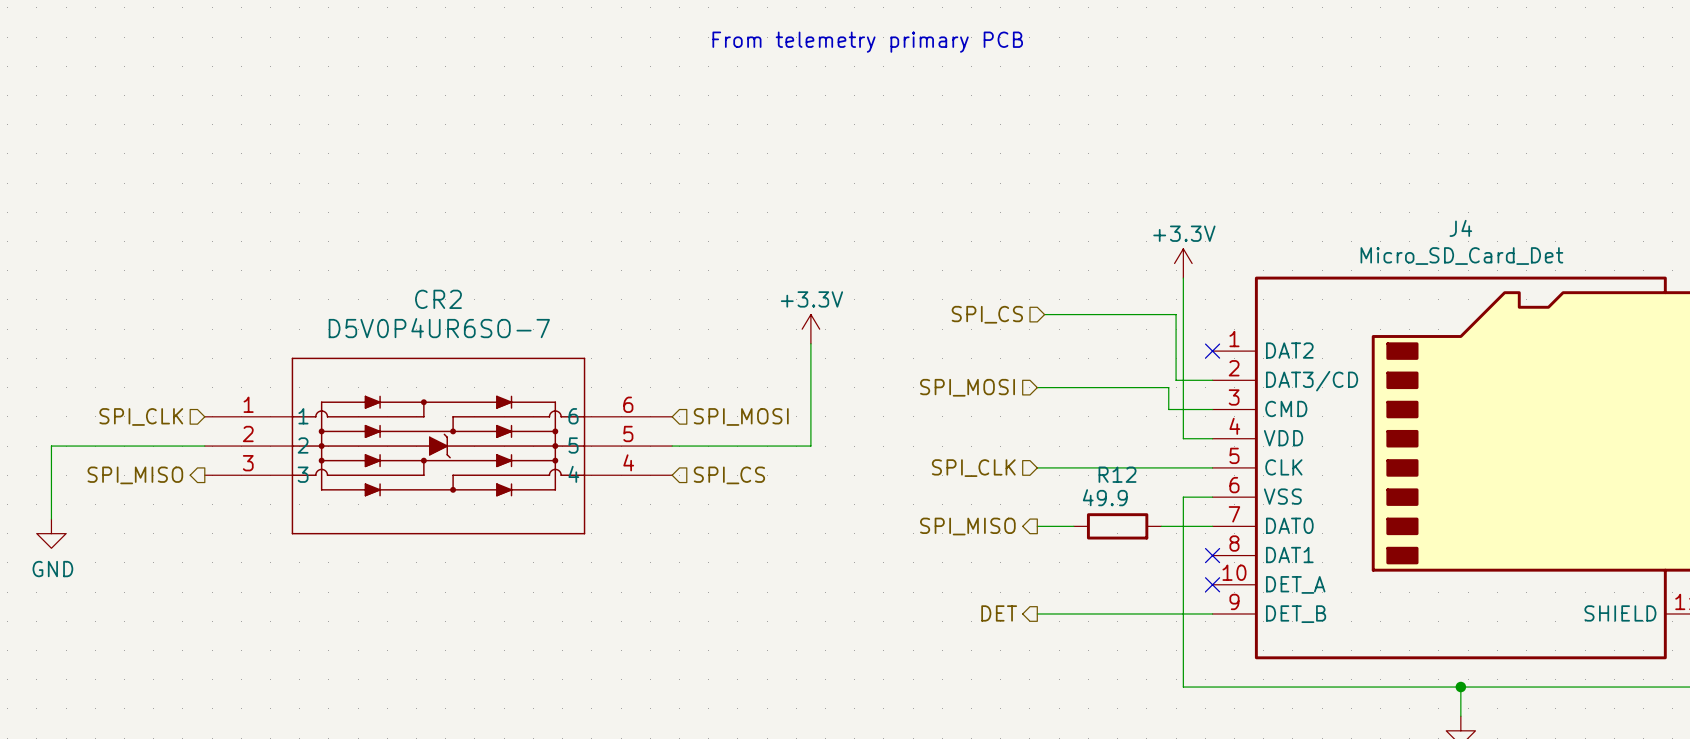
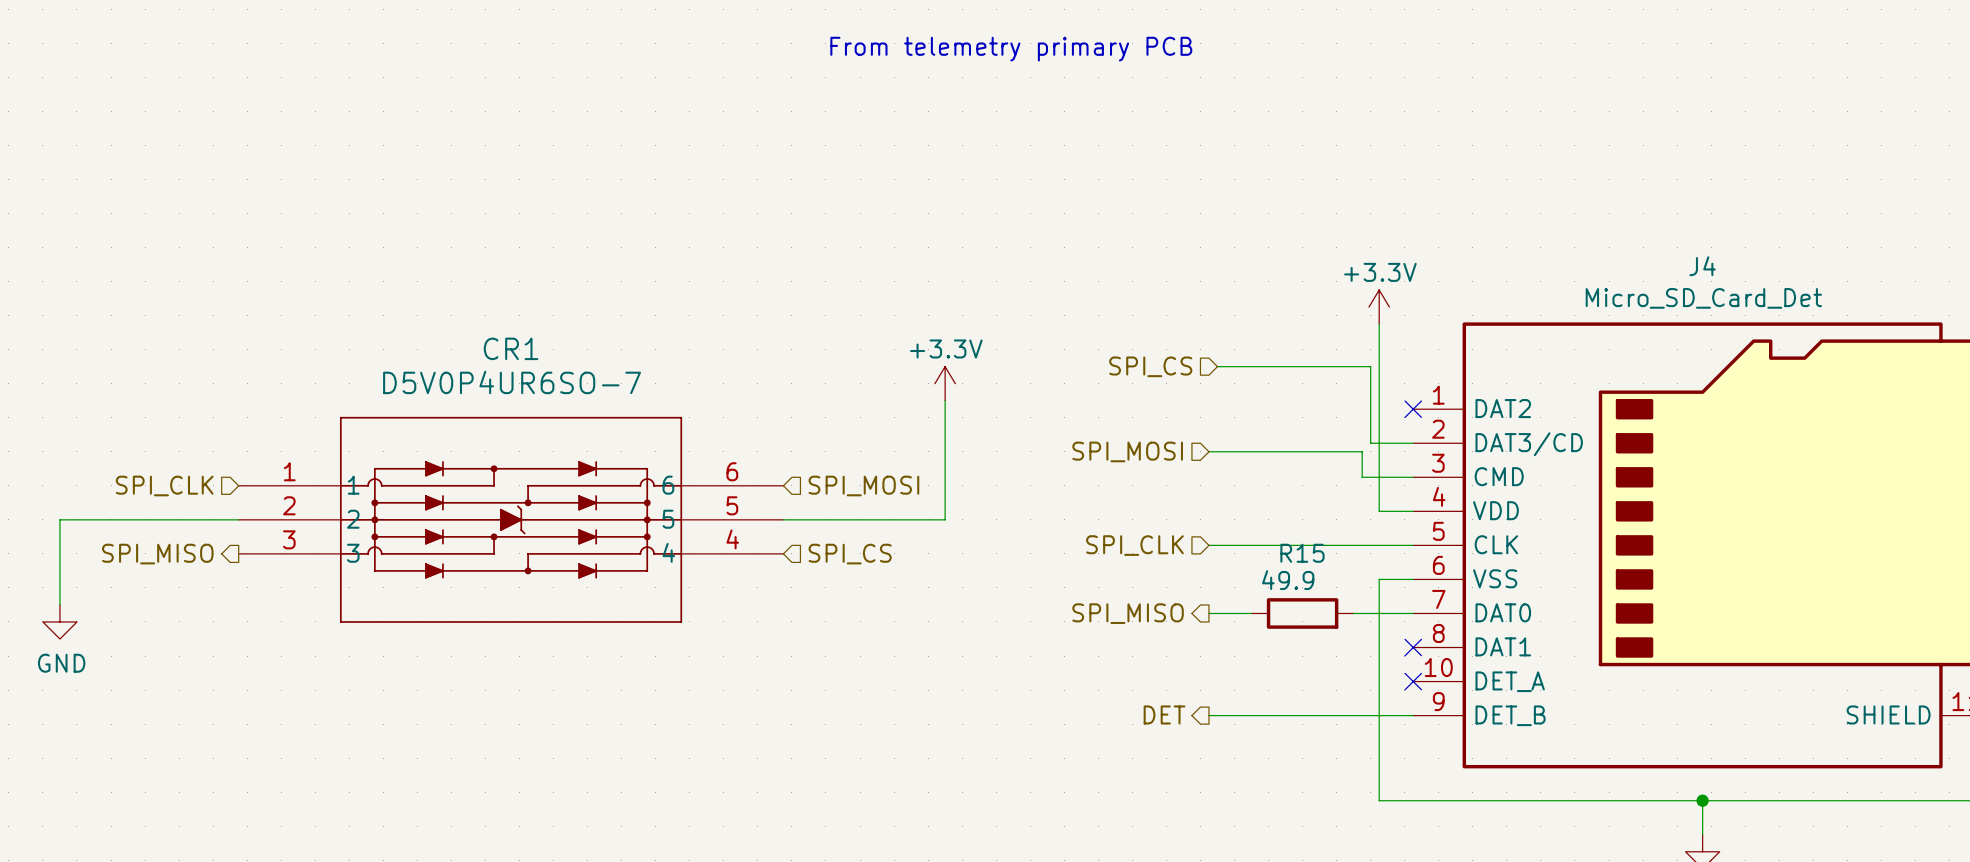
CR2 name: CR2 (438, 299) -> CR1 (511, 348)
R12 name: R12 (1117, 474) -> R15 (1302, 553)

